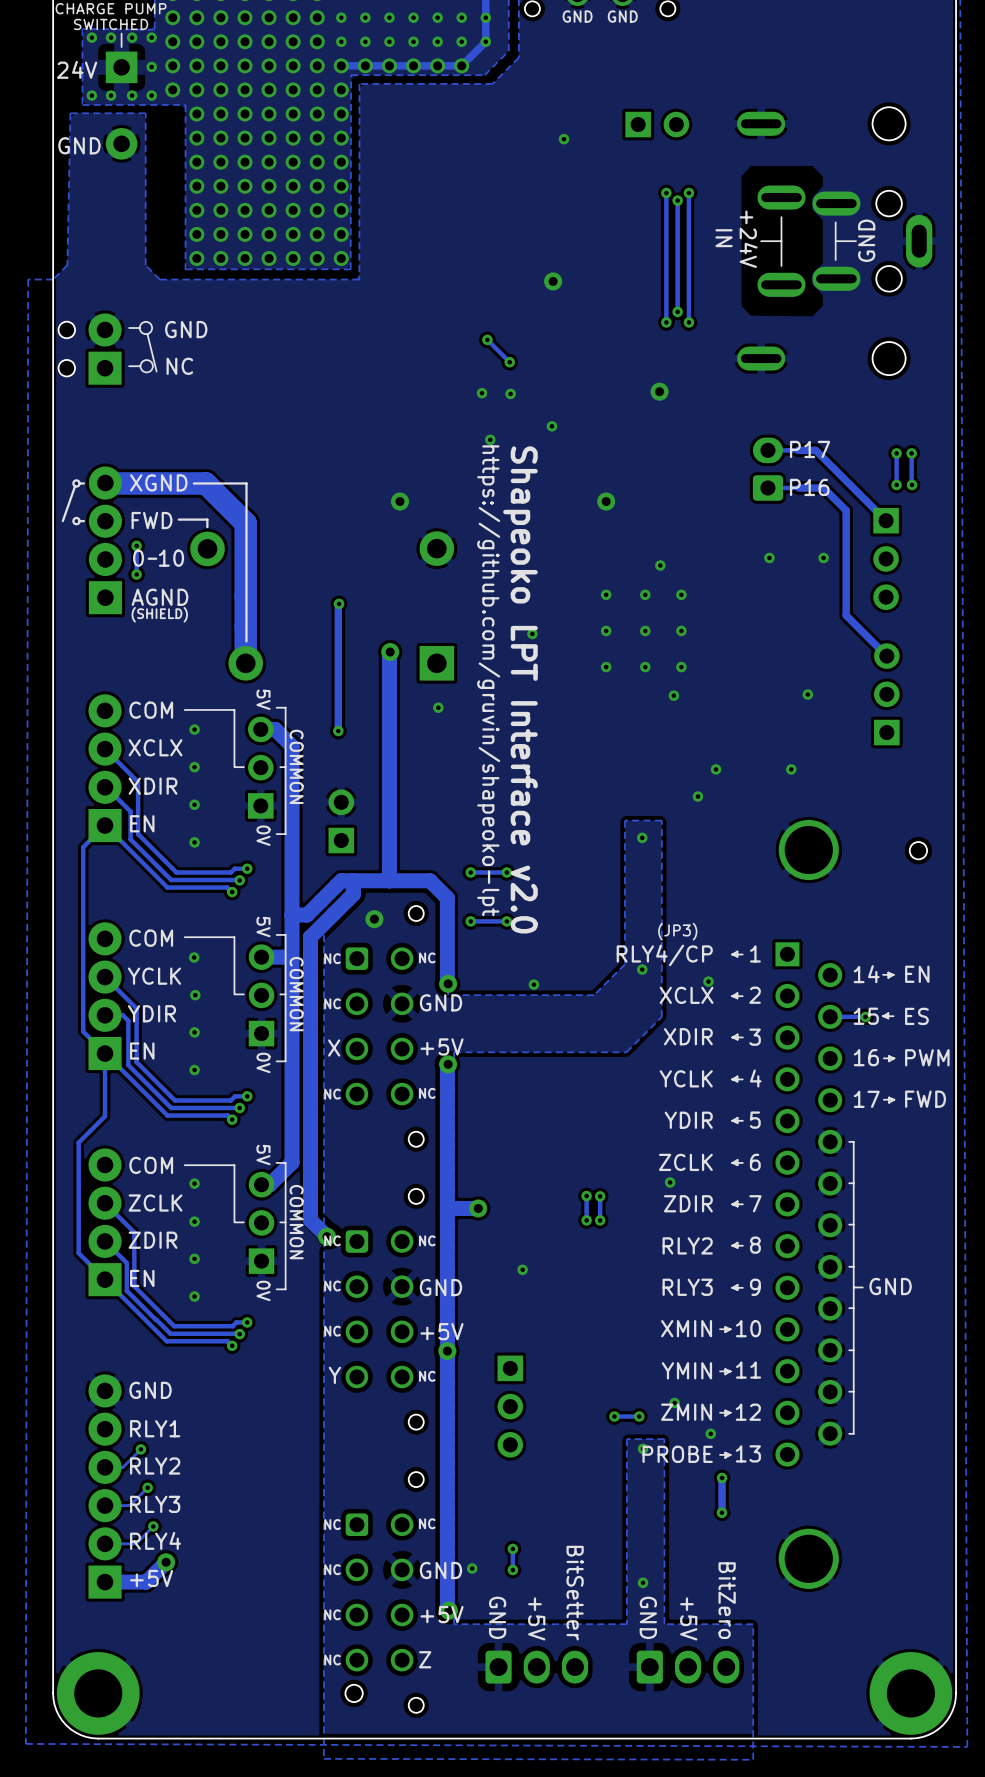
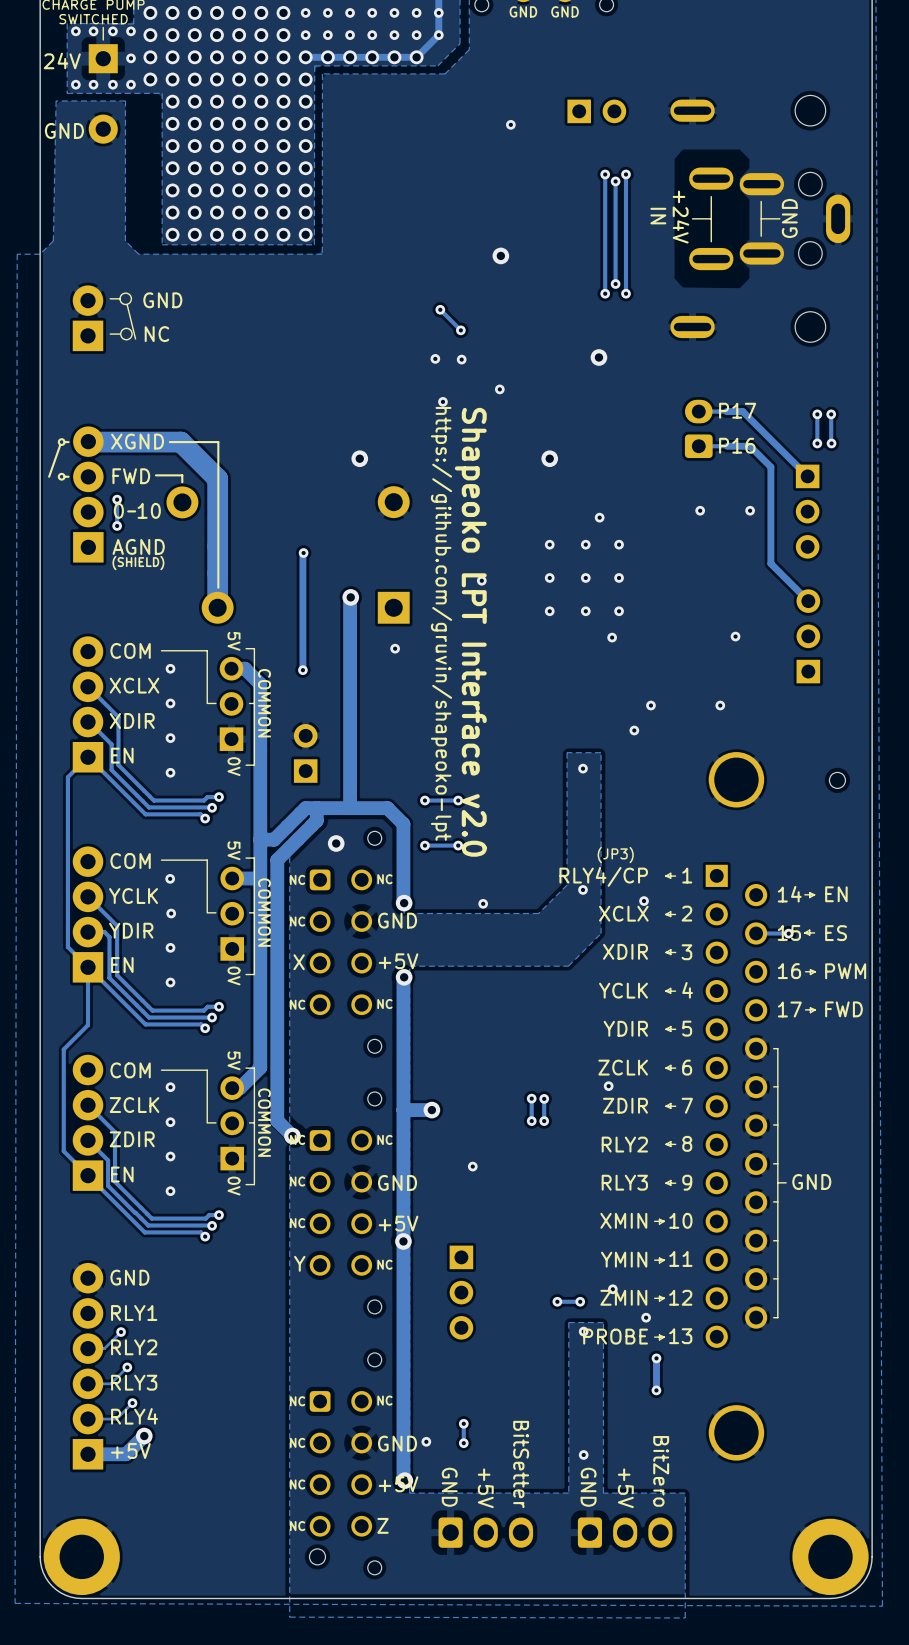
part footprint: [58, 313, 122, 385] -> [72, 285, 104, 352]

